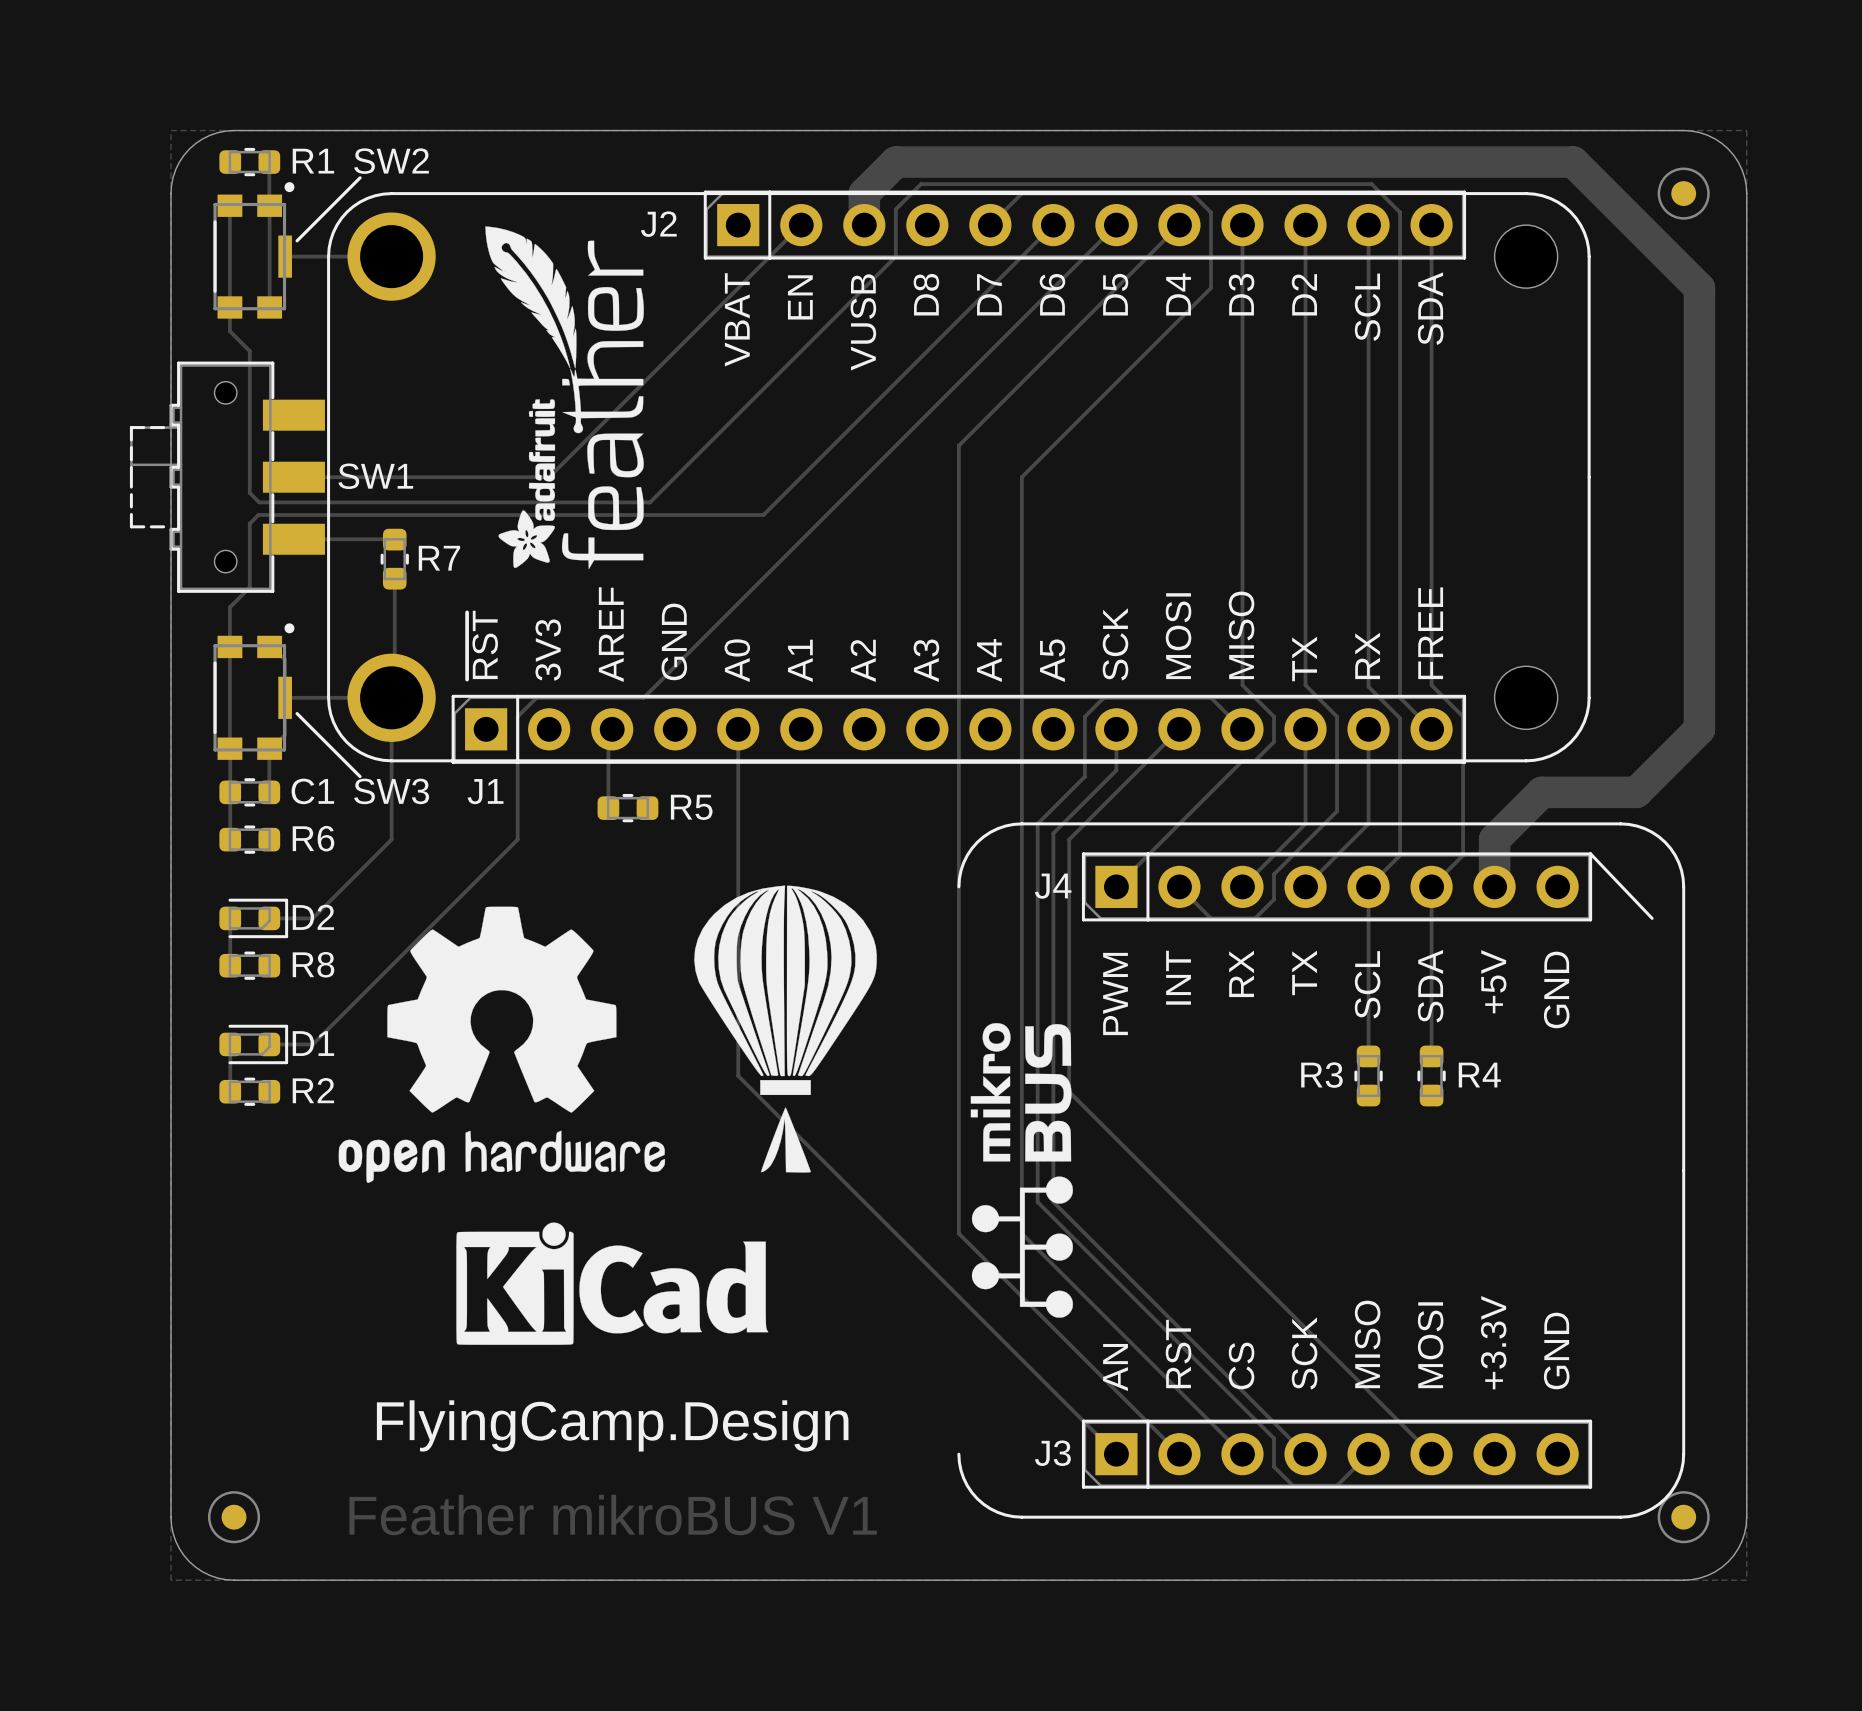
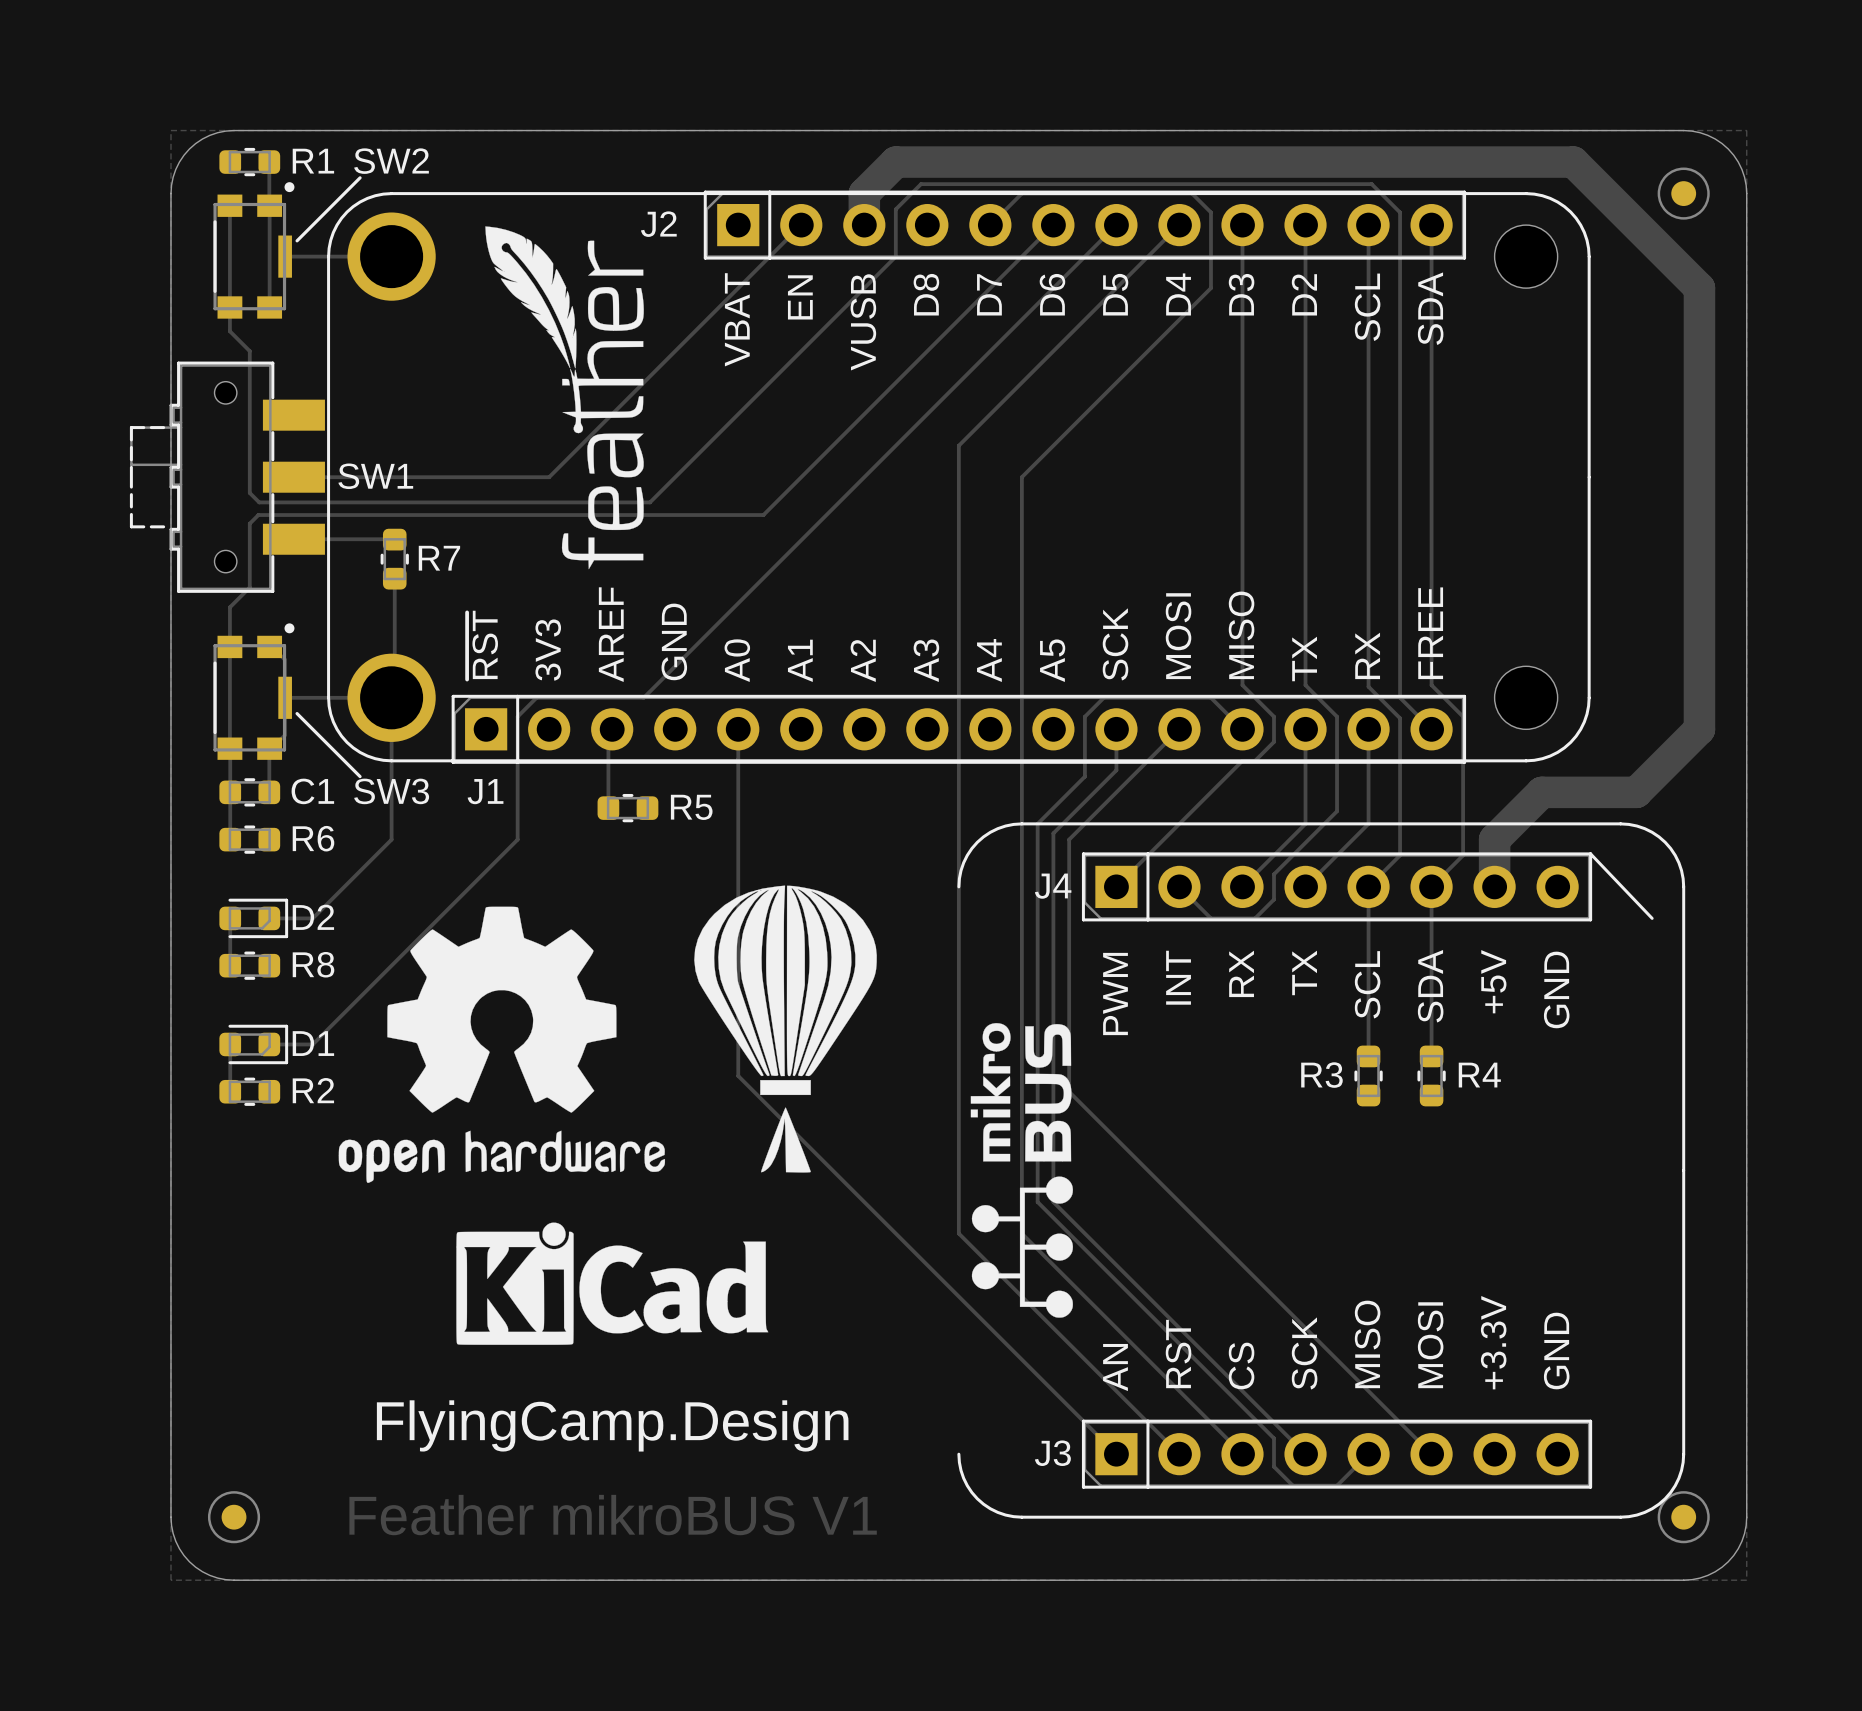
drawing shape: [485, 226, 644, 570] -> [485, 226, 644, 570]

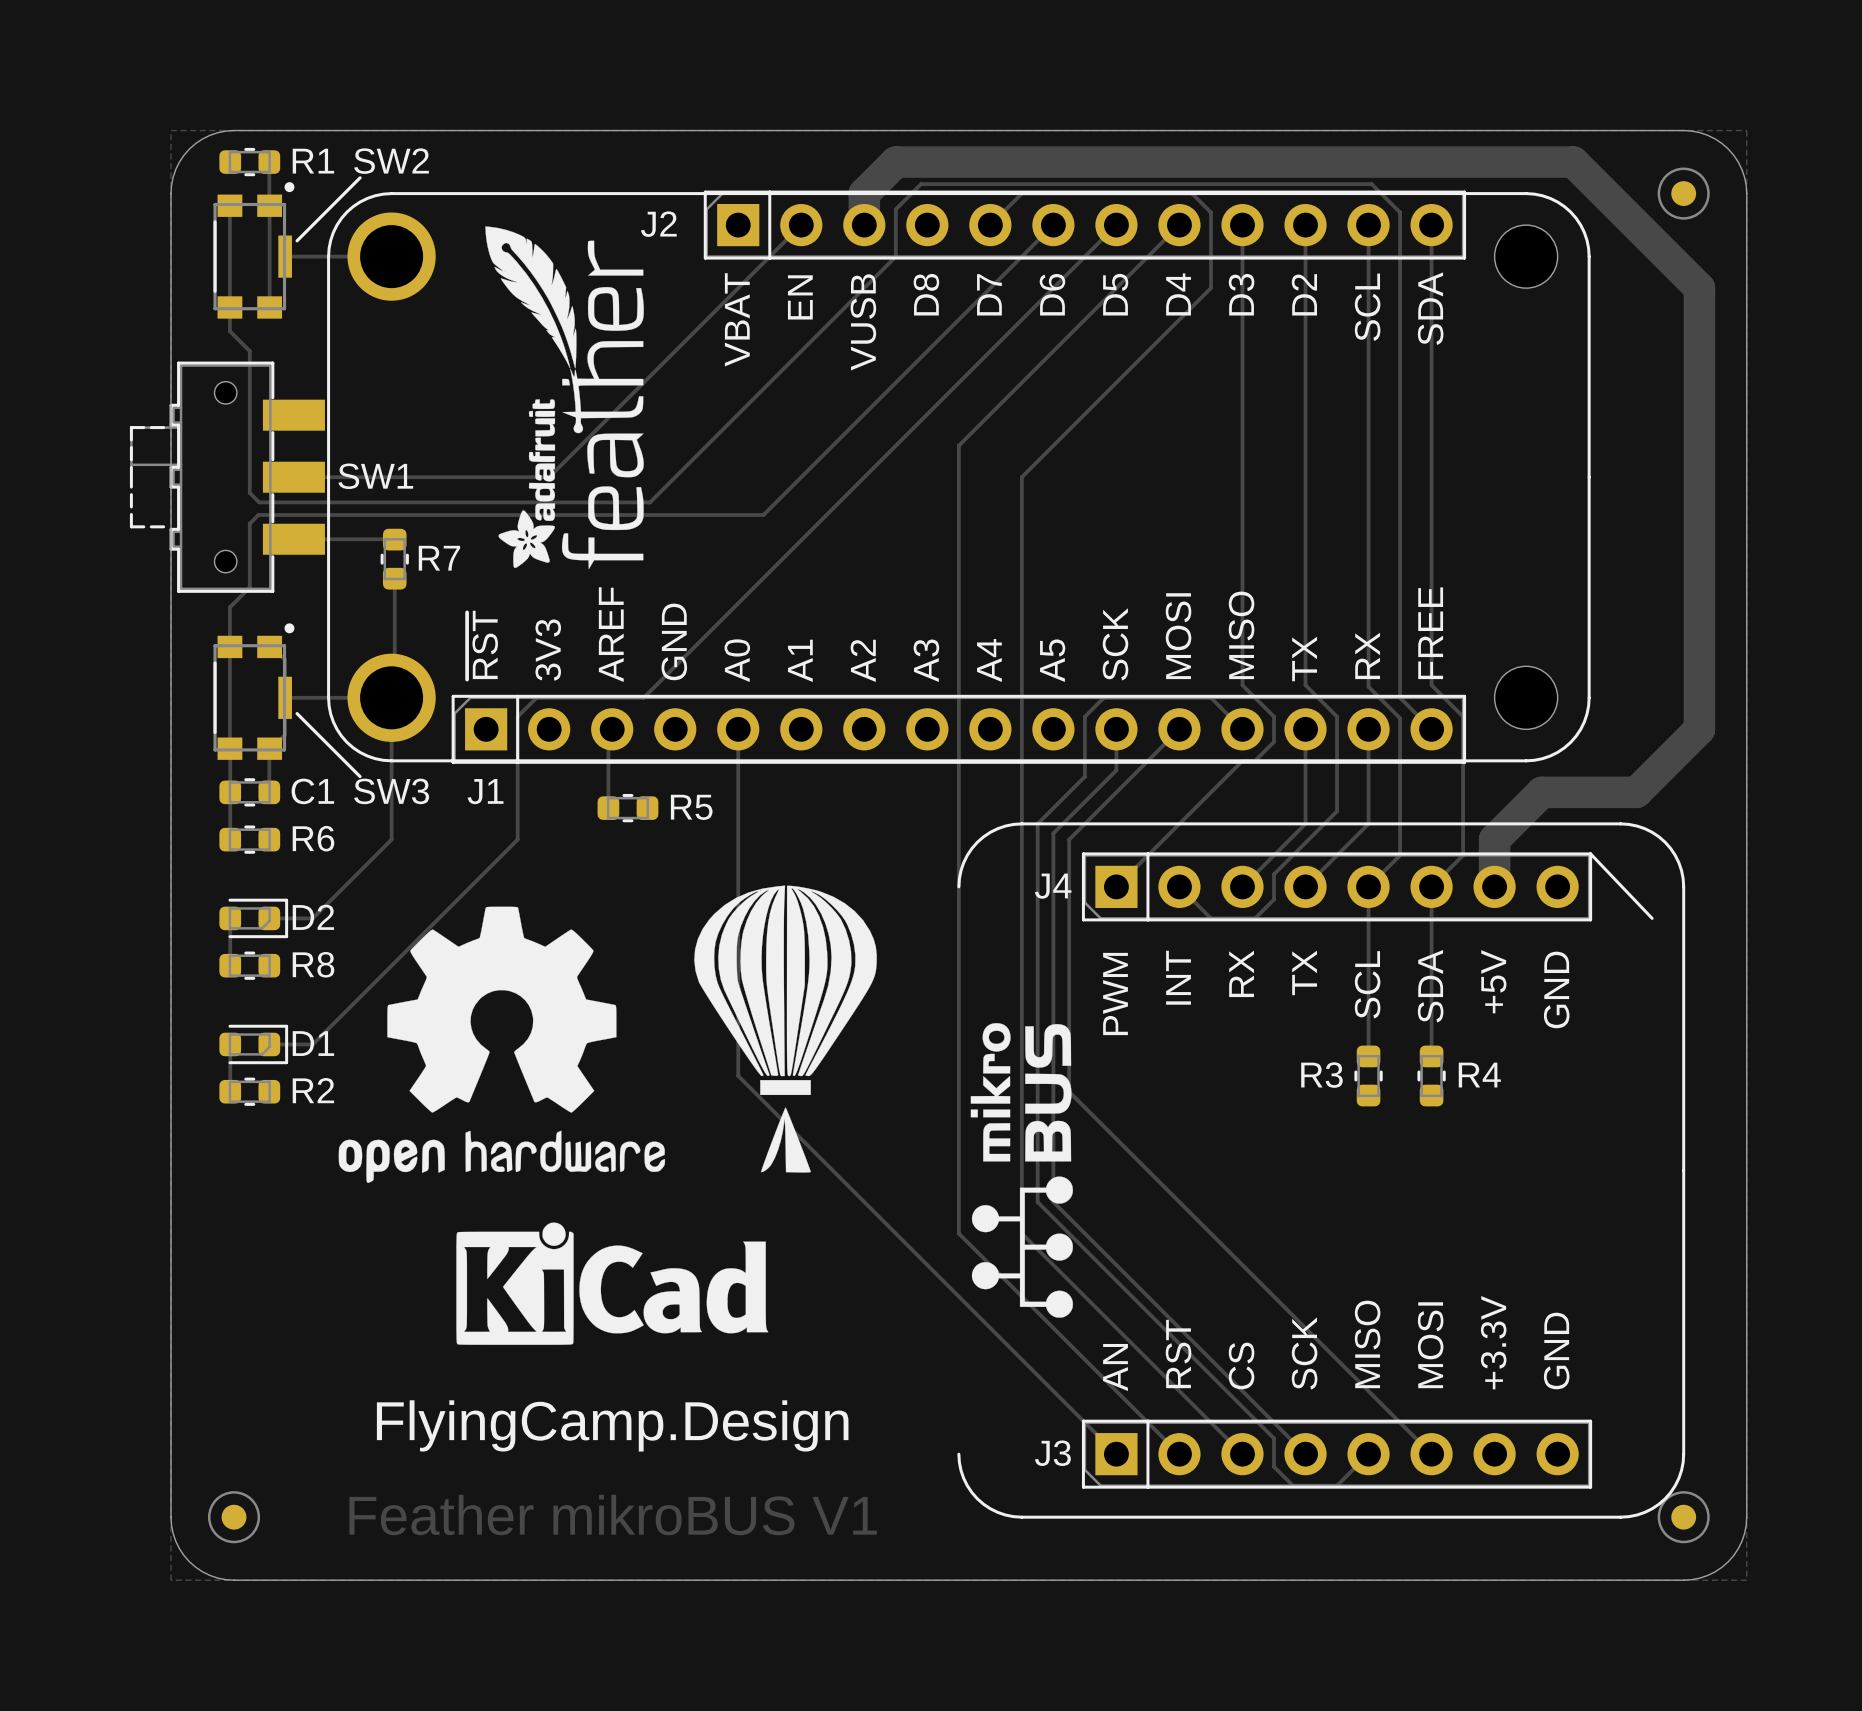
drawing shape: [485, 226, 644, 570] -> [485, 226, 644, 570]

